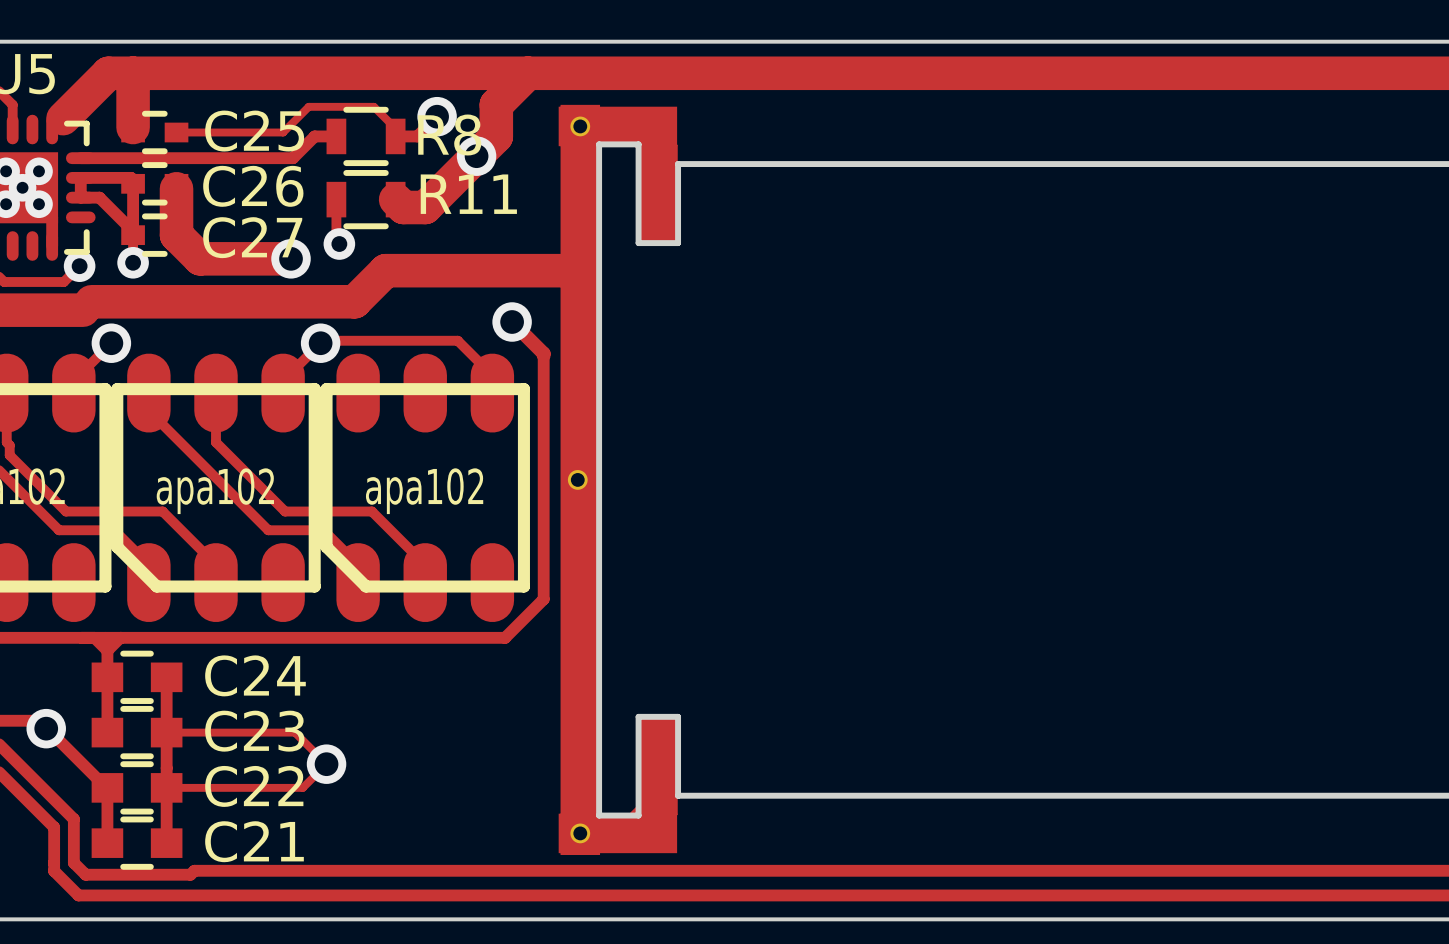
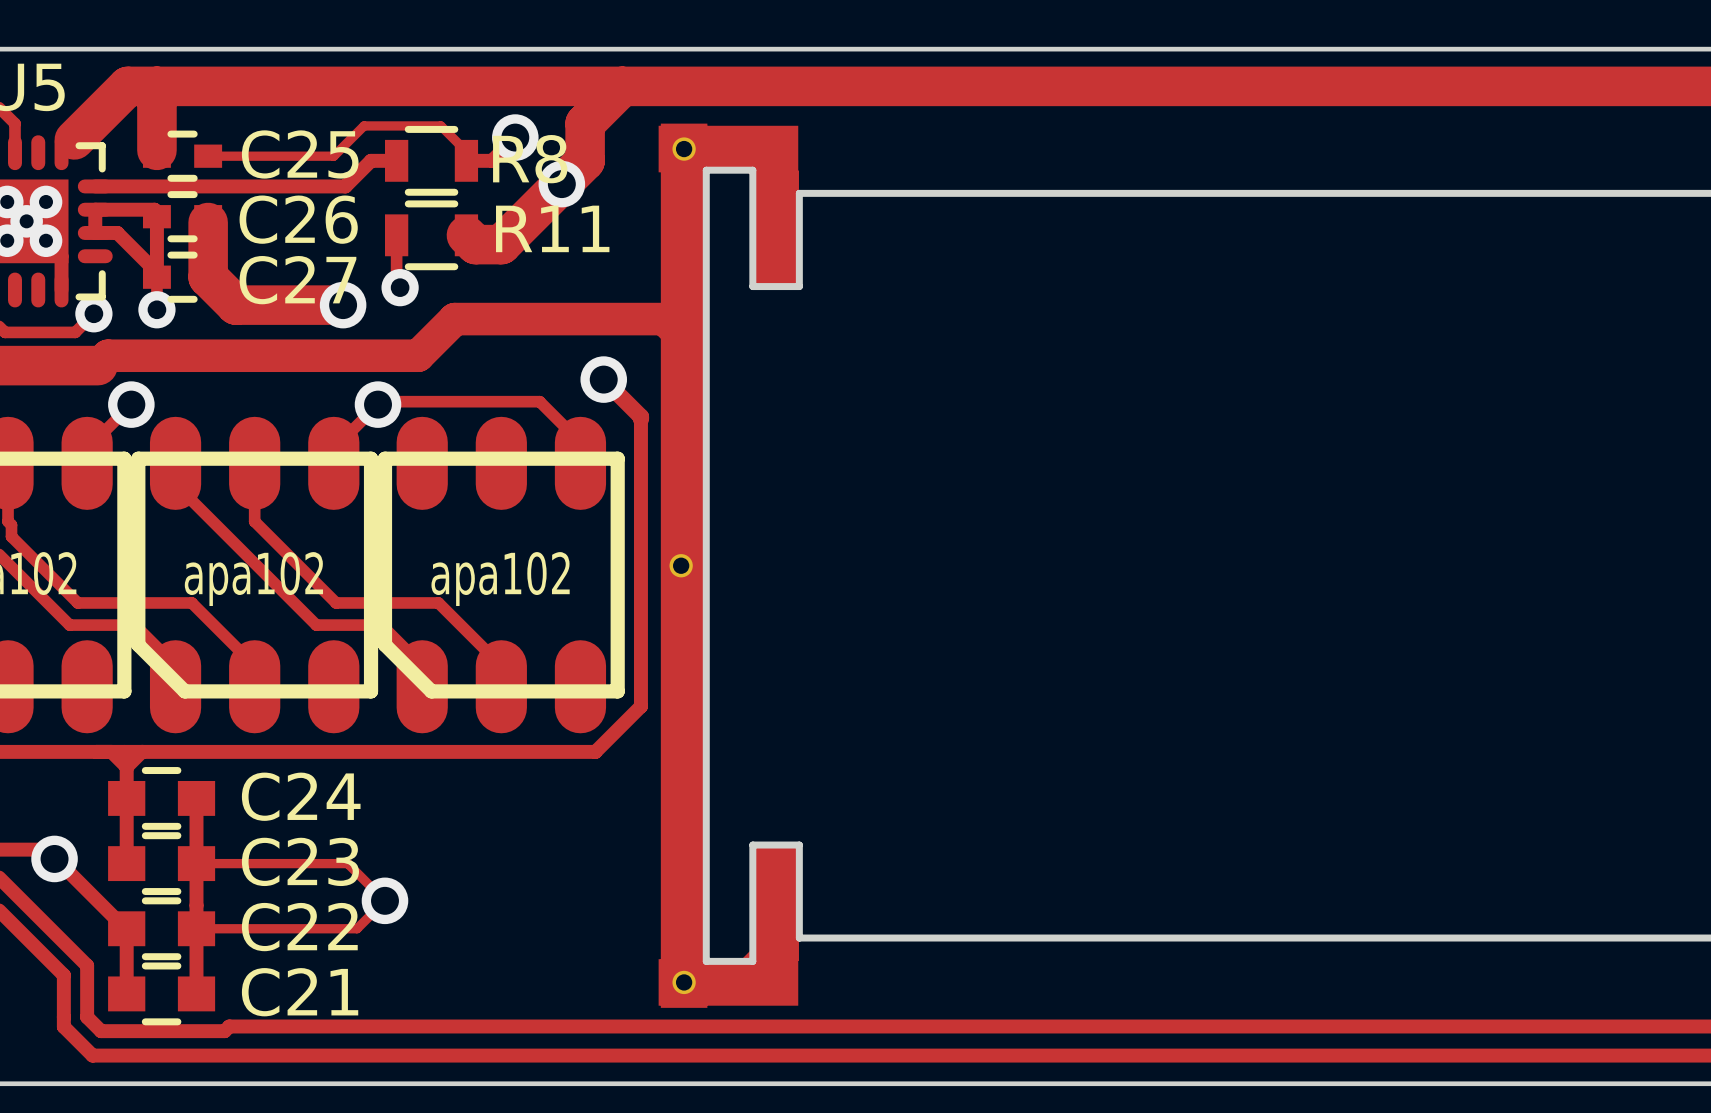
track width: thick (563, 270) (385, 270) (354, 301) (91, 301) -> thin (664, 319) (454, 319) (418, 355) (107, 355)

